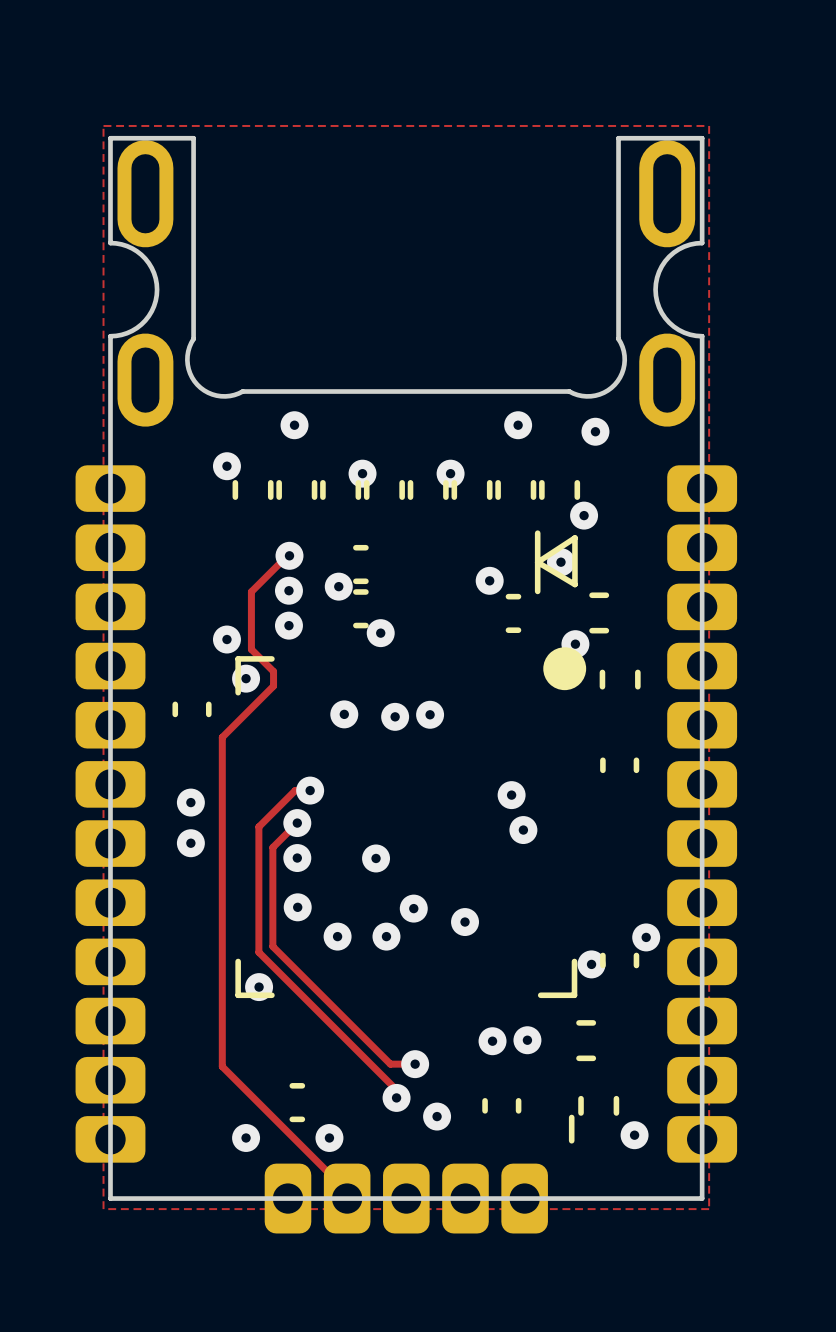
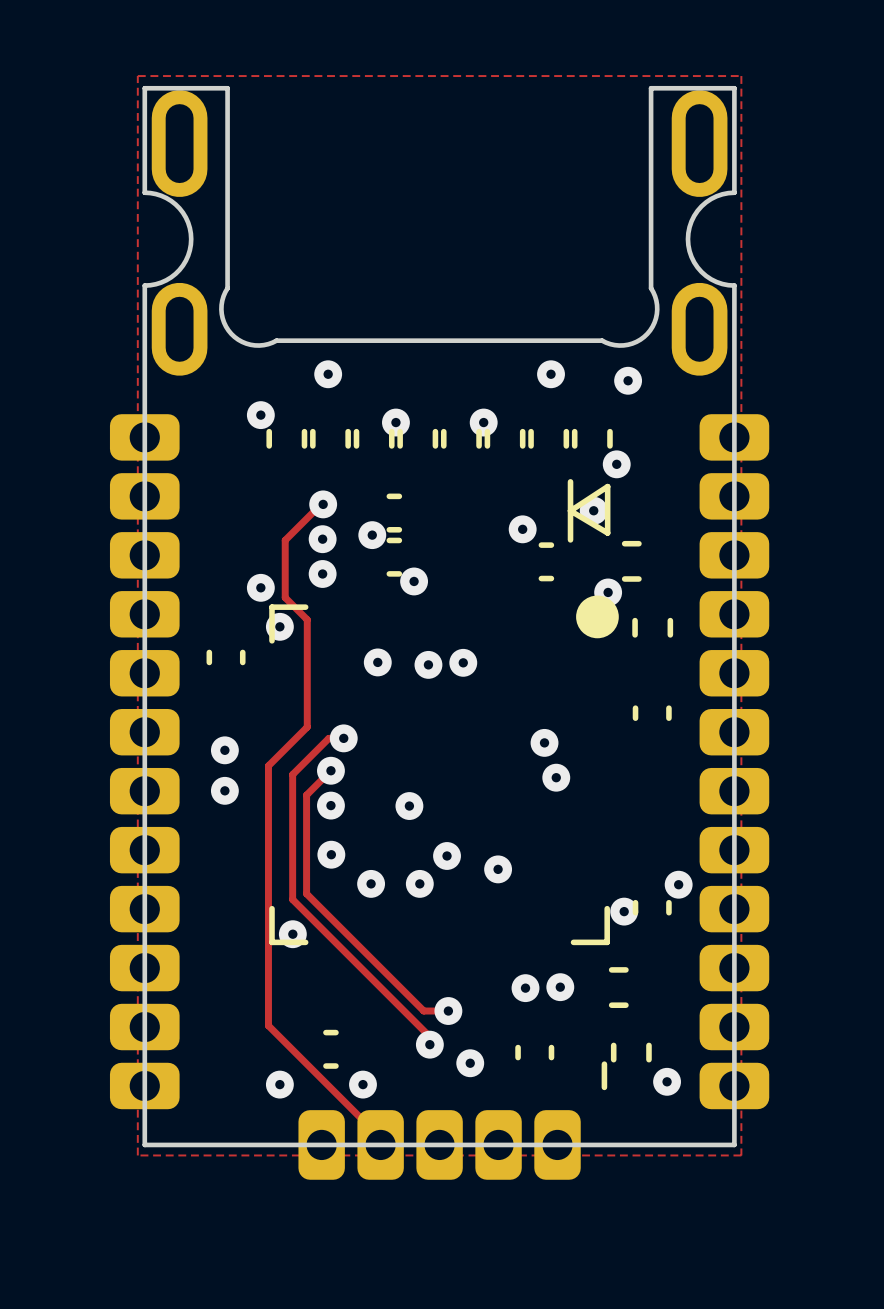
track: (273, 686) (222, 737) (222, 1066) (234, 1078) -> (307, 634) (307, 727) (268, 765) (268, 1025)

